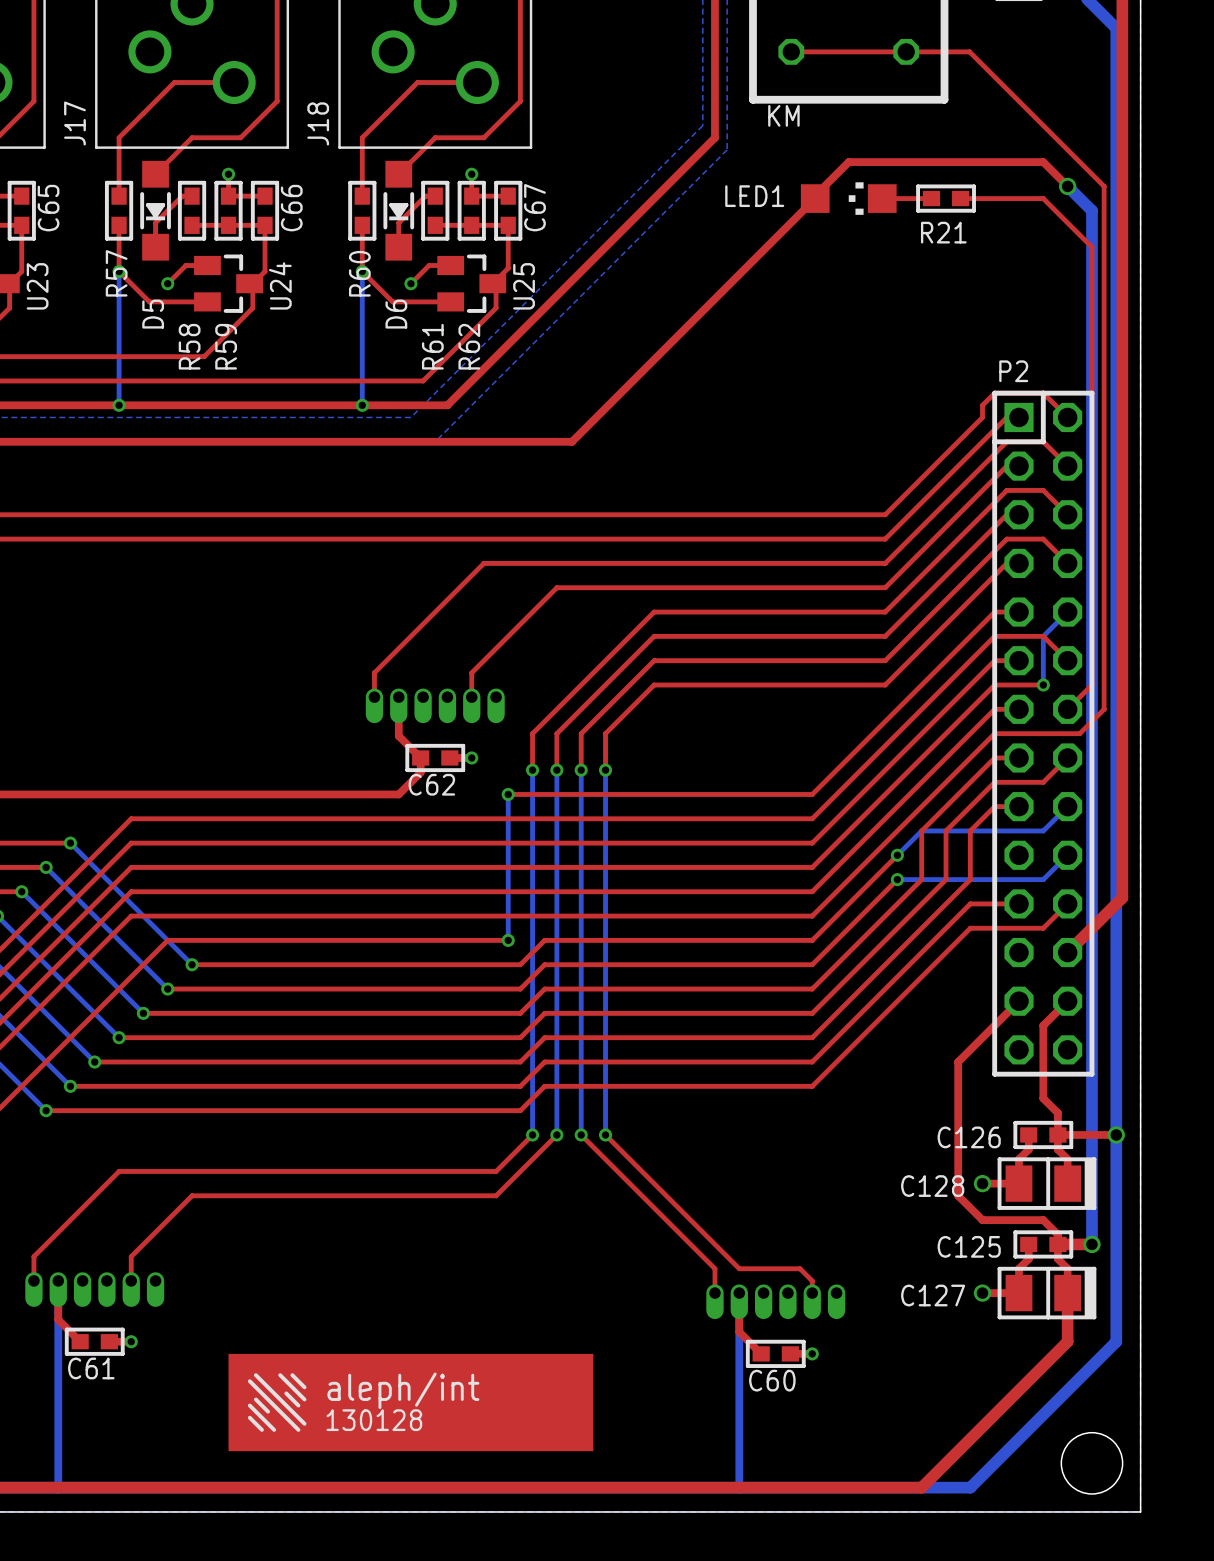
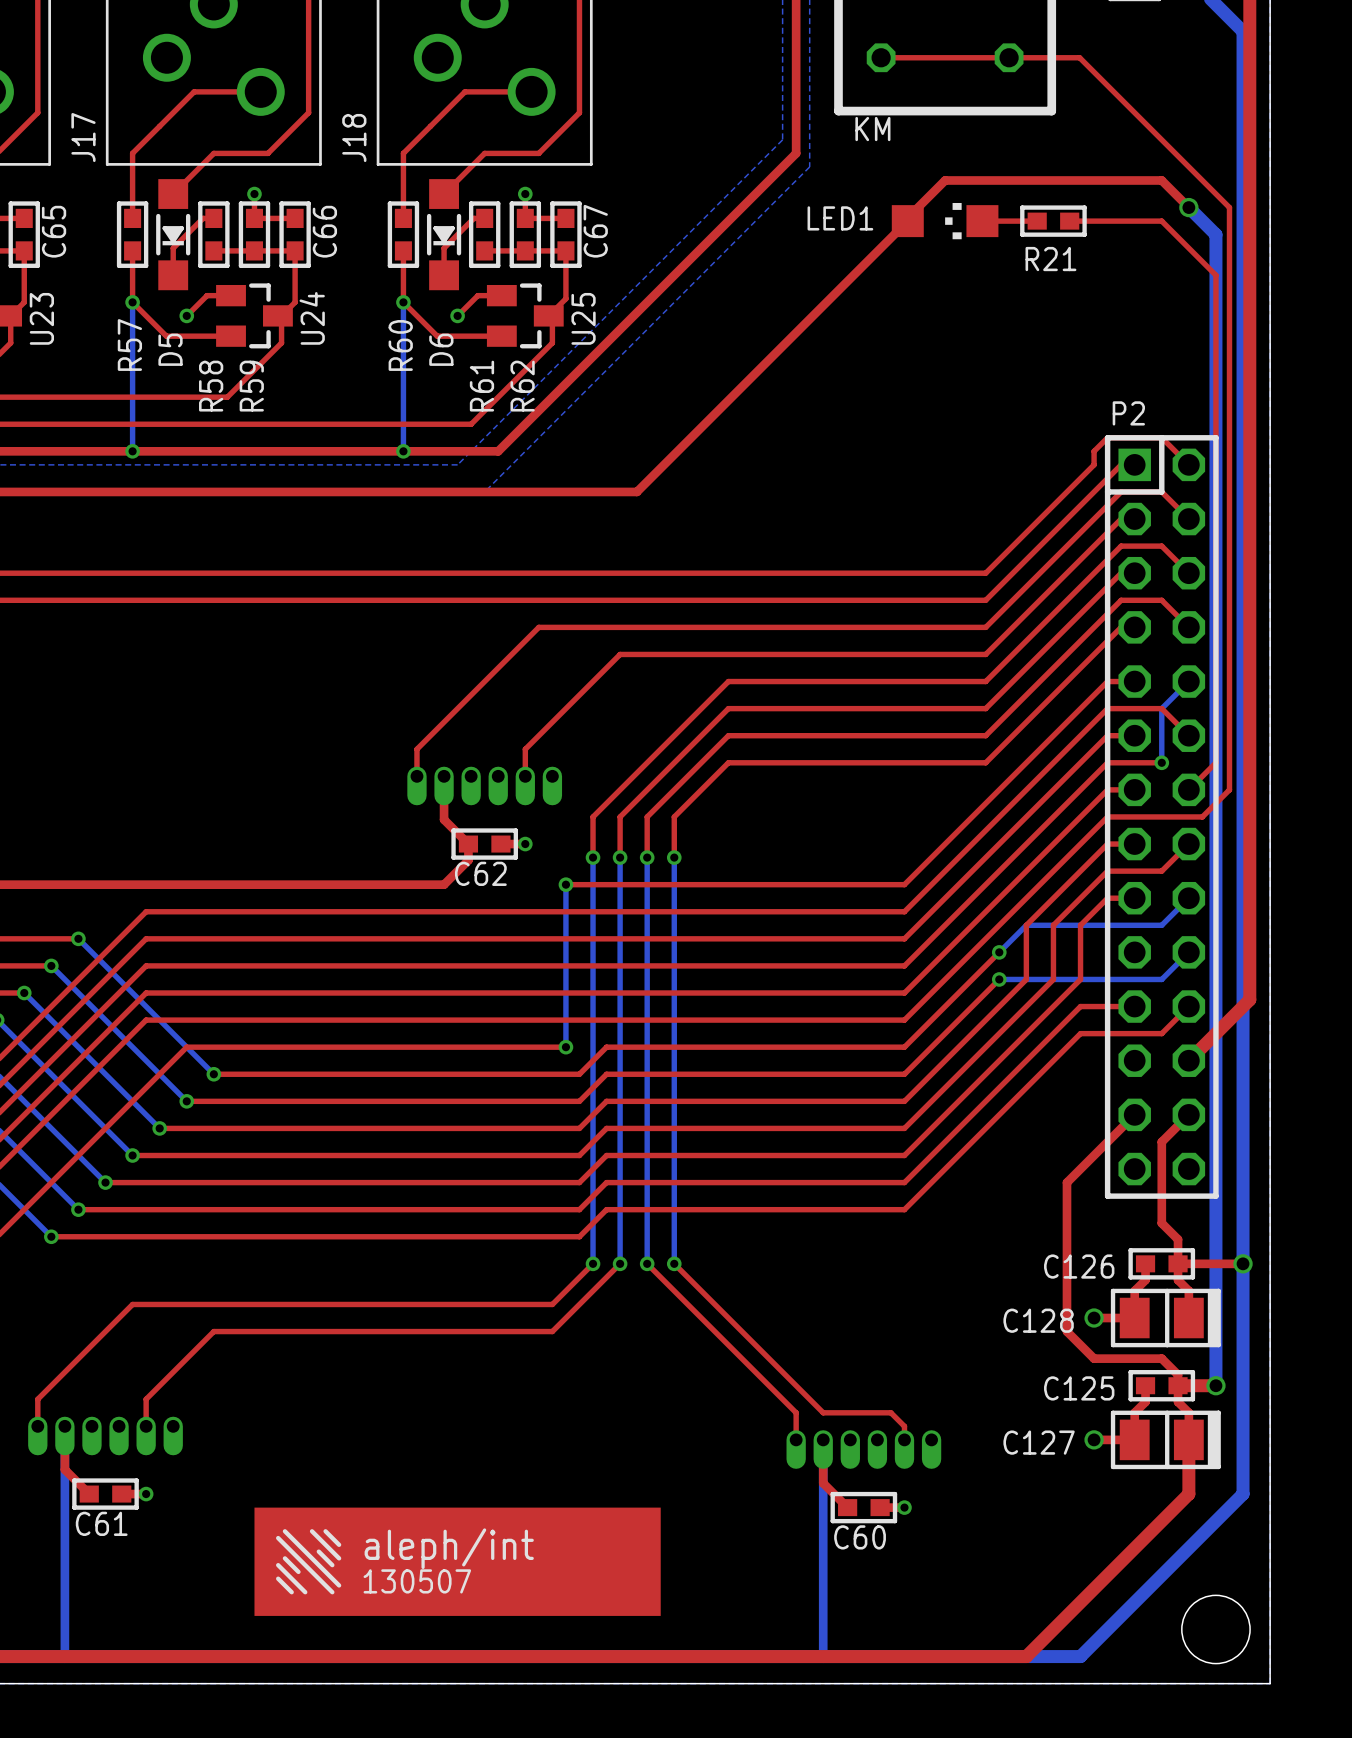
R57 name position: R57 (116, 273) -> R57 (129, 345)
R60 name position: R60 (359, 273) -> R60 (400, 345)
text: 130128 (374, 1420) -> 130507 (417, 1581)

